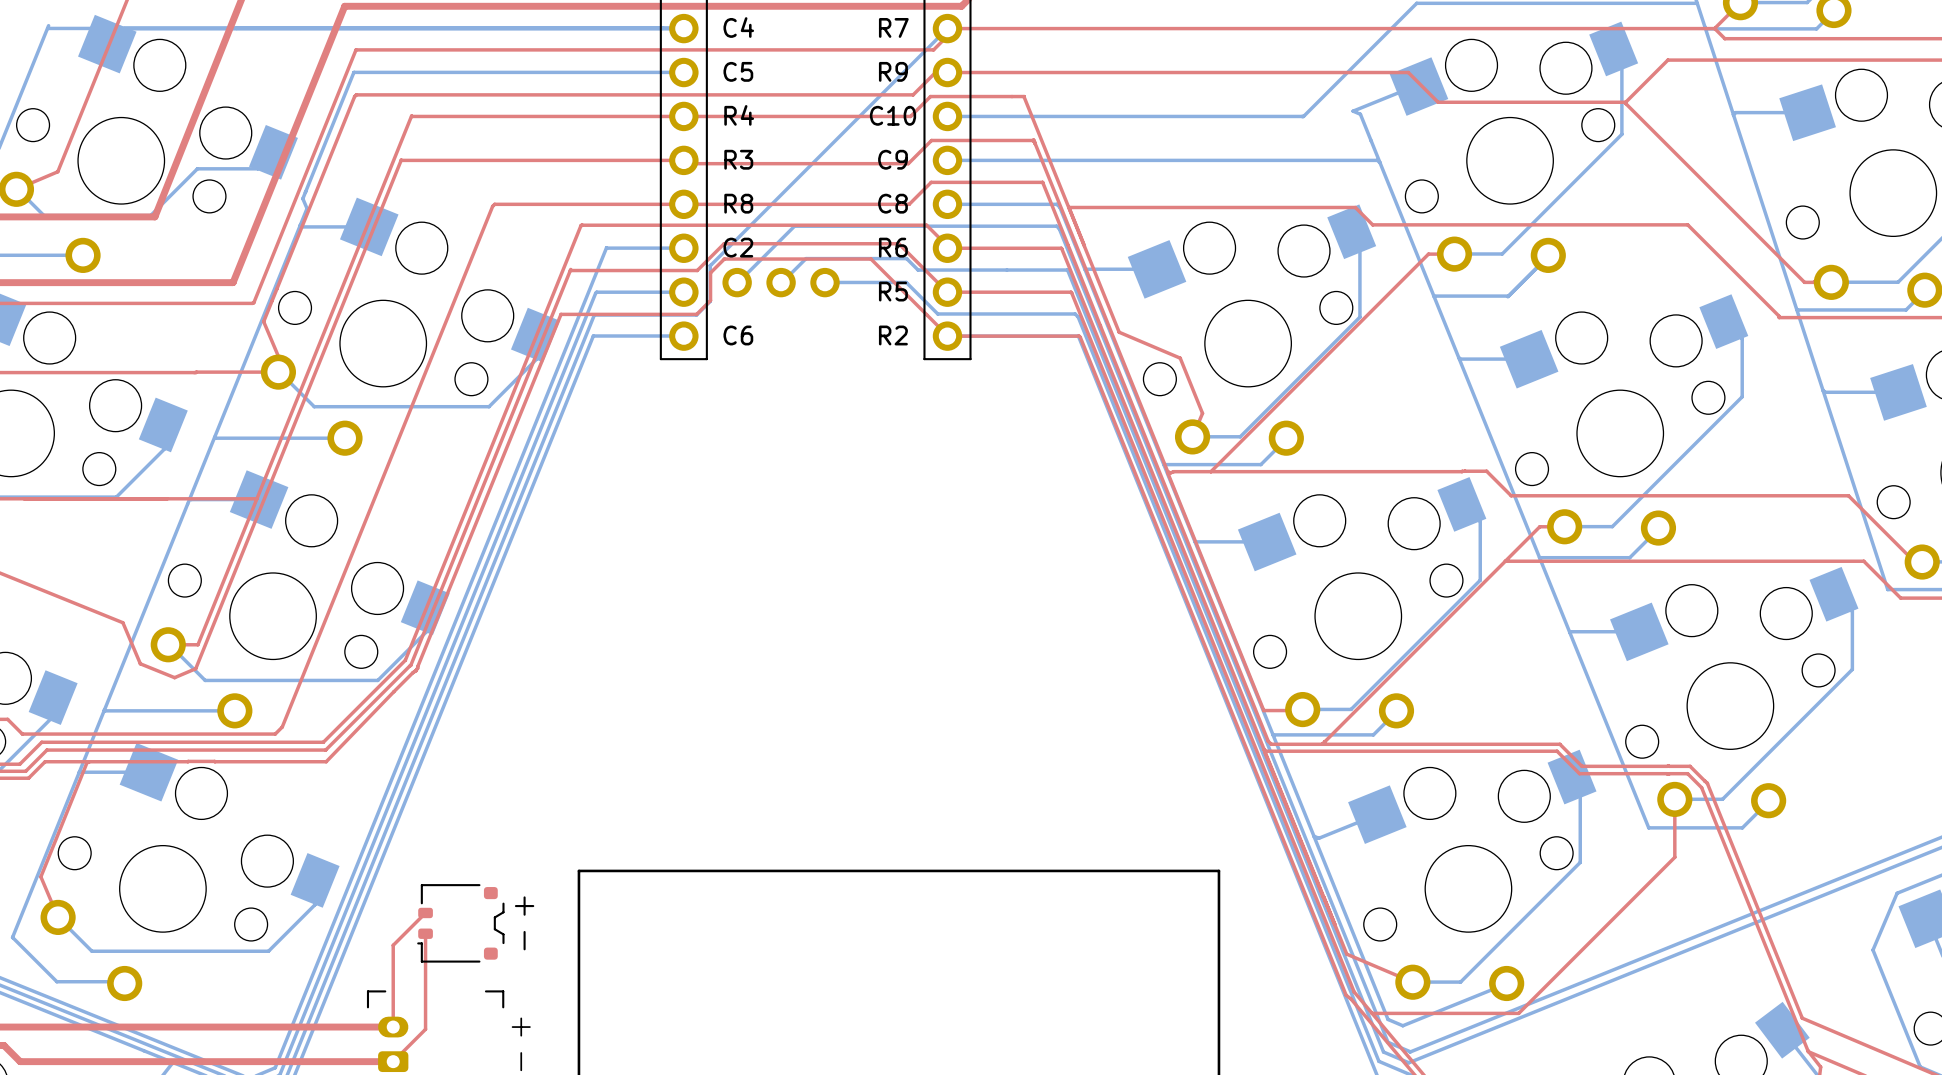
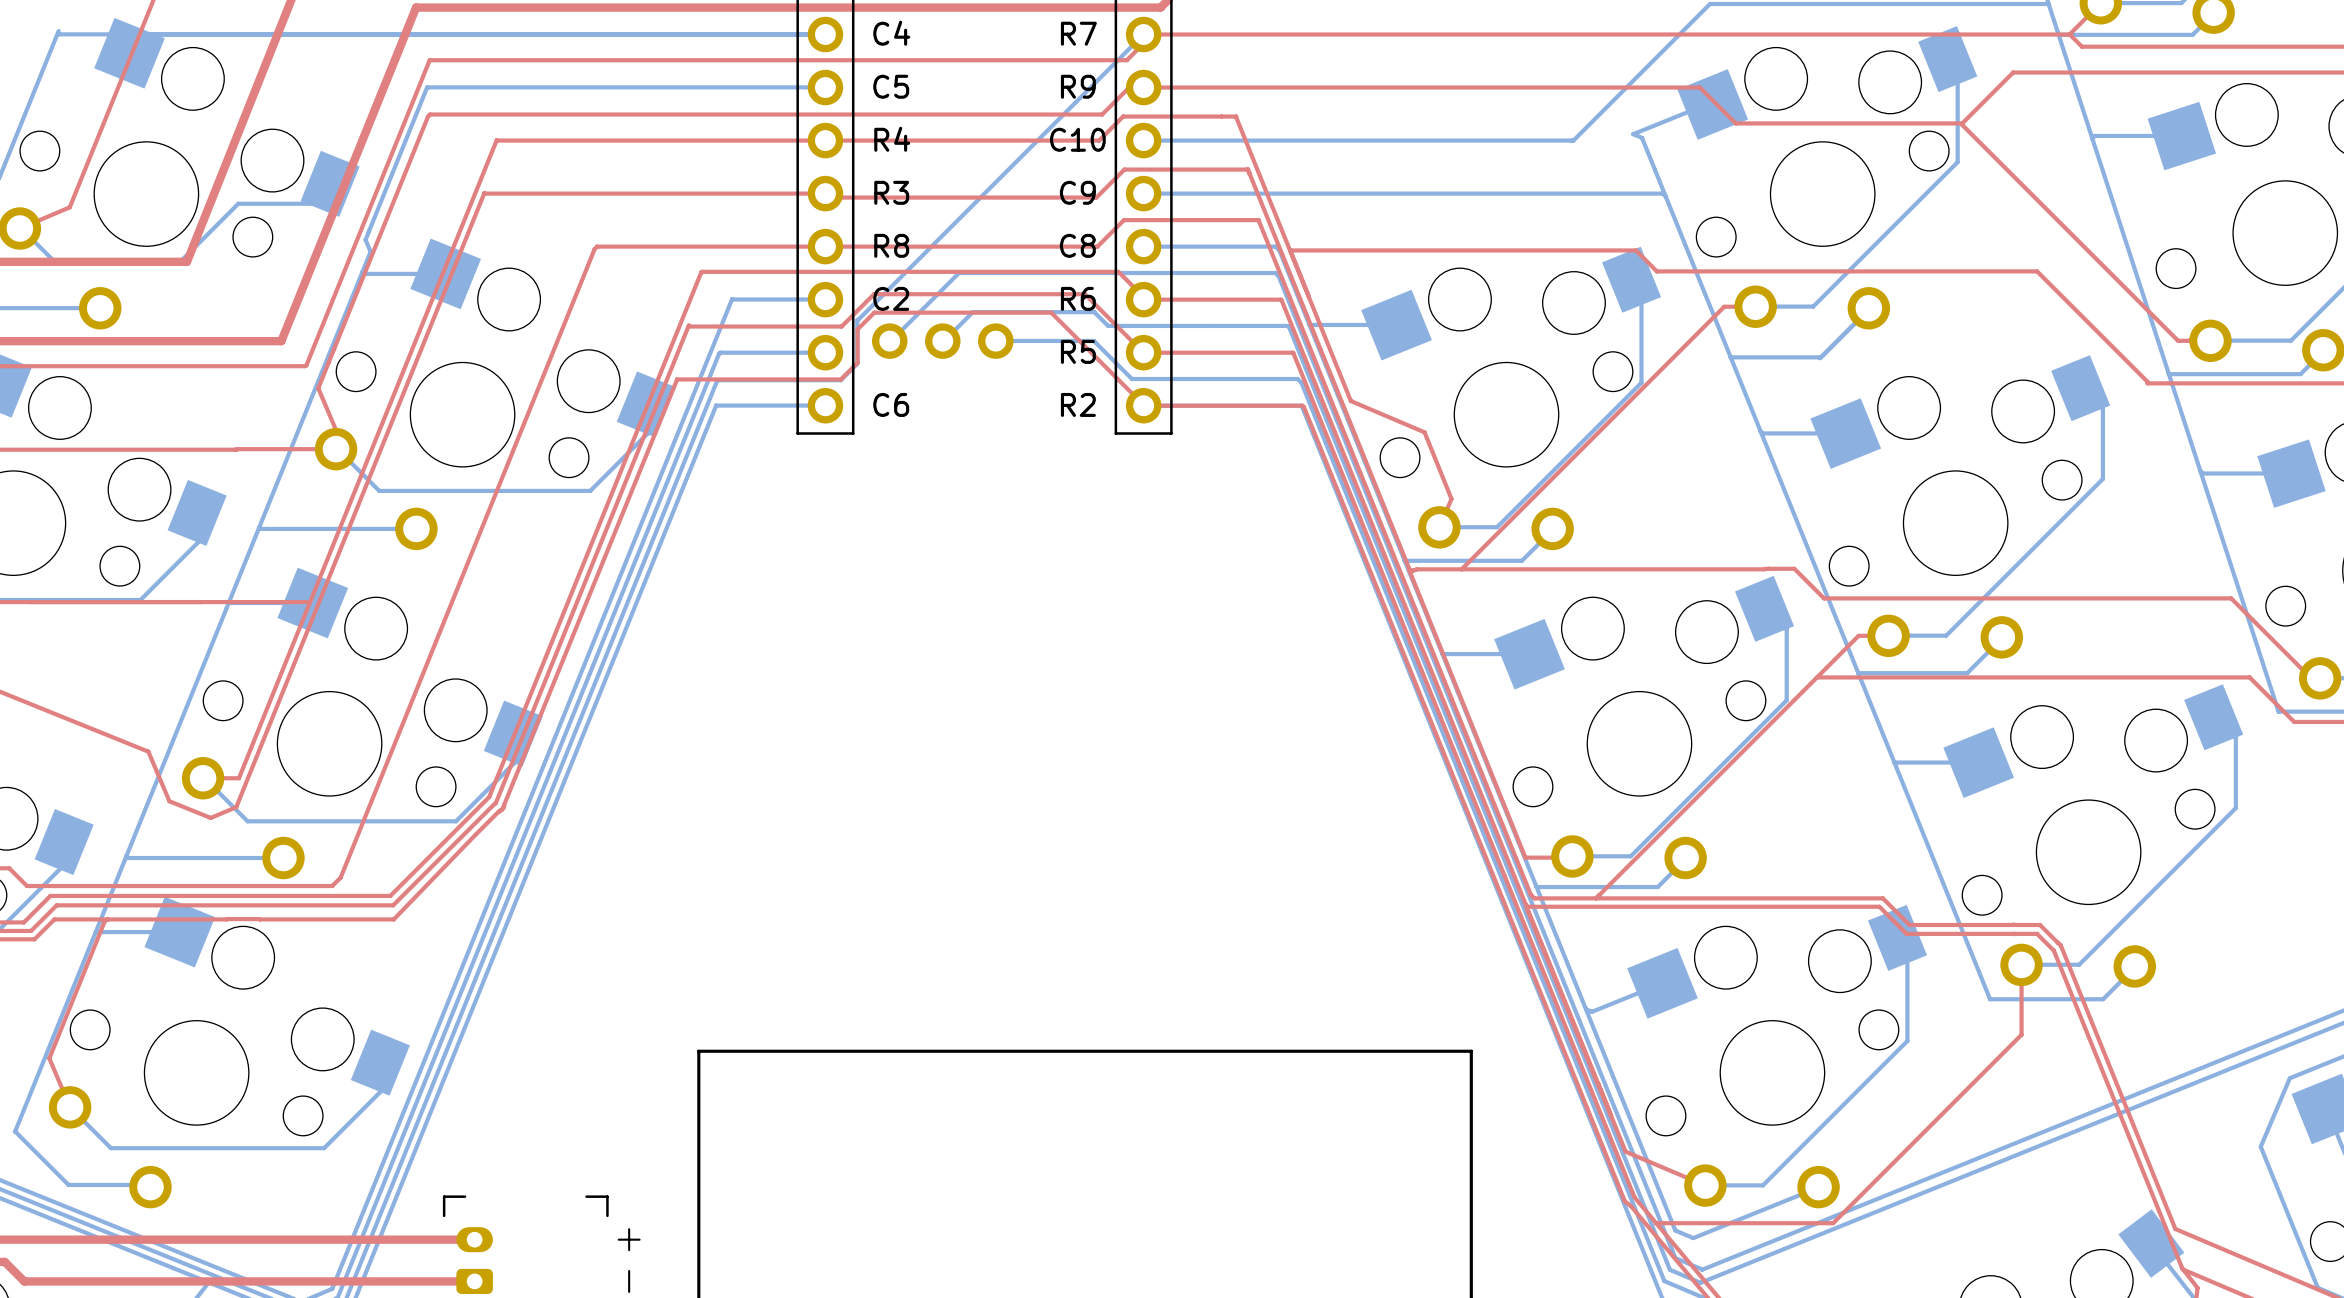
top track: (425, 912) (393, 945) (393, 1027) -> none
part: (475, 923) -> none
top track: (425, 933) (425, 1029) (393, 1061) -> none

